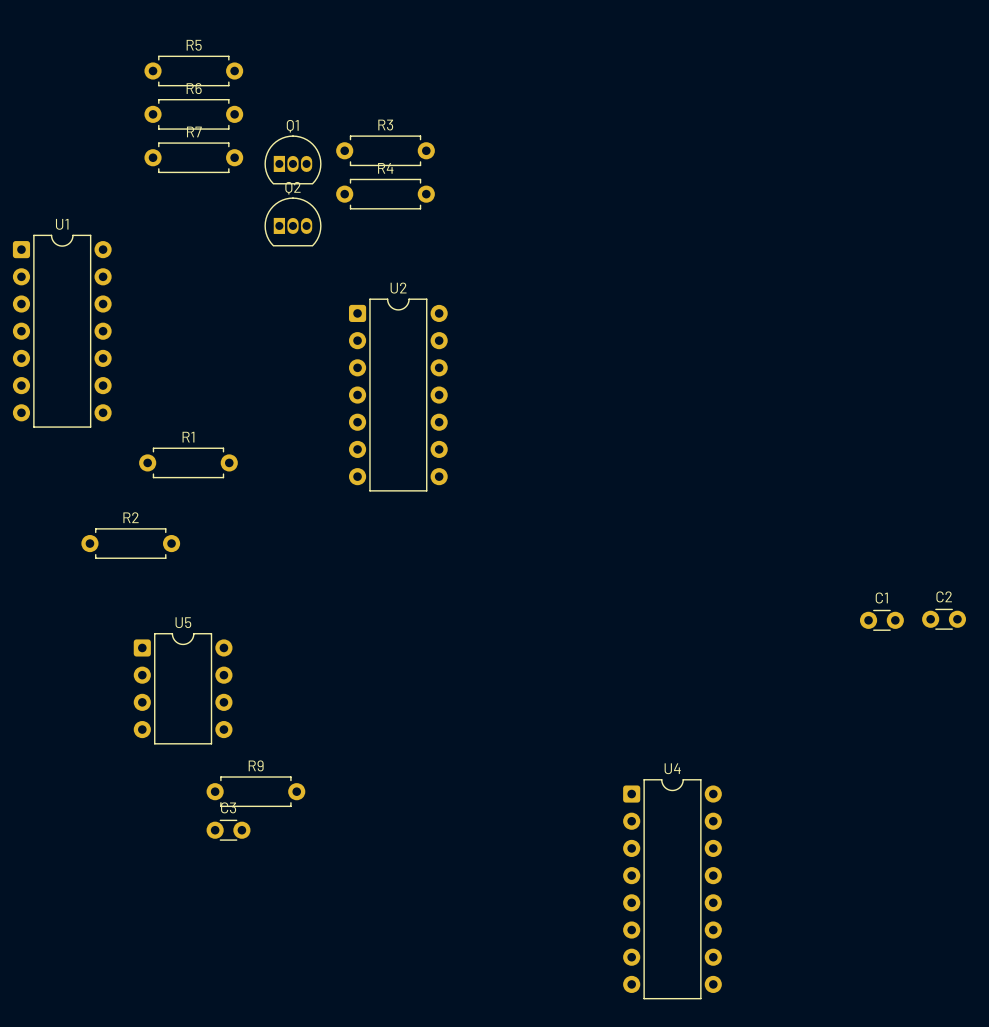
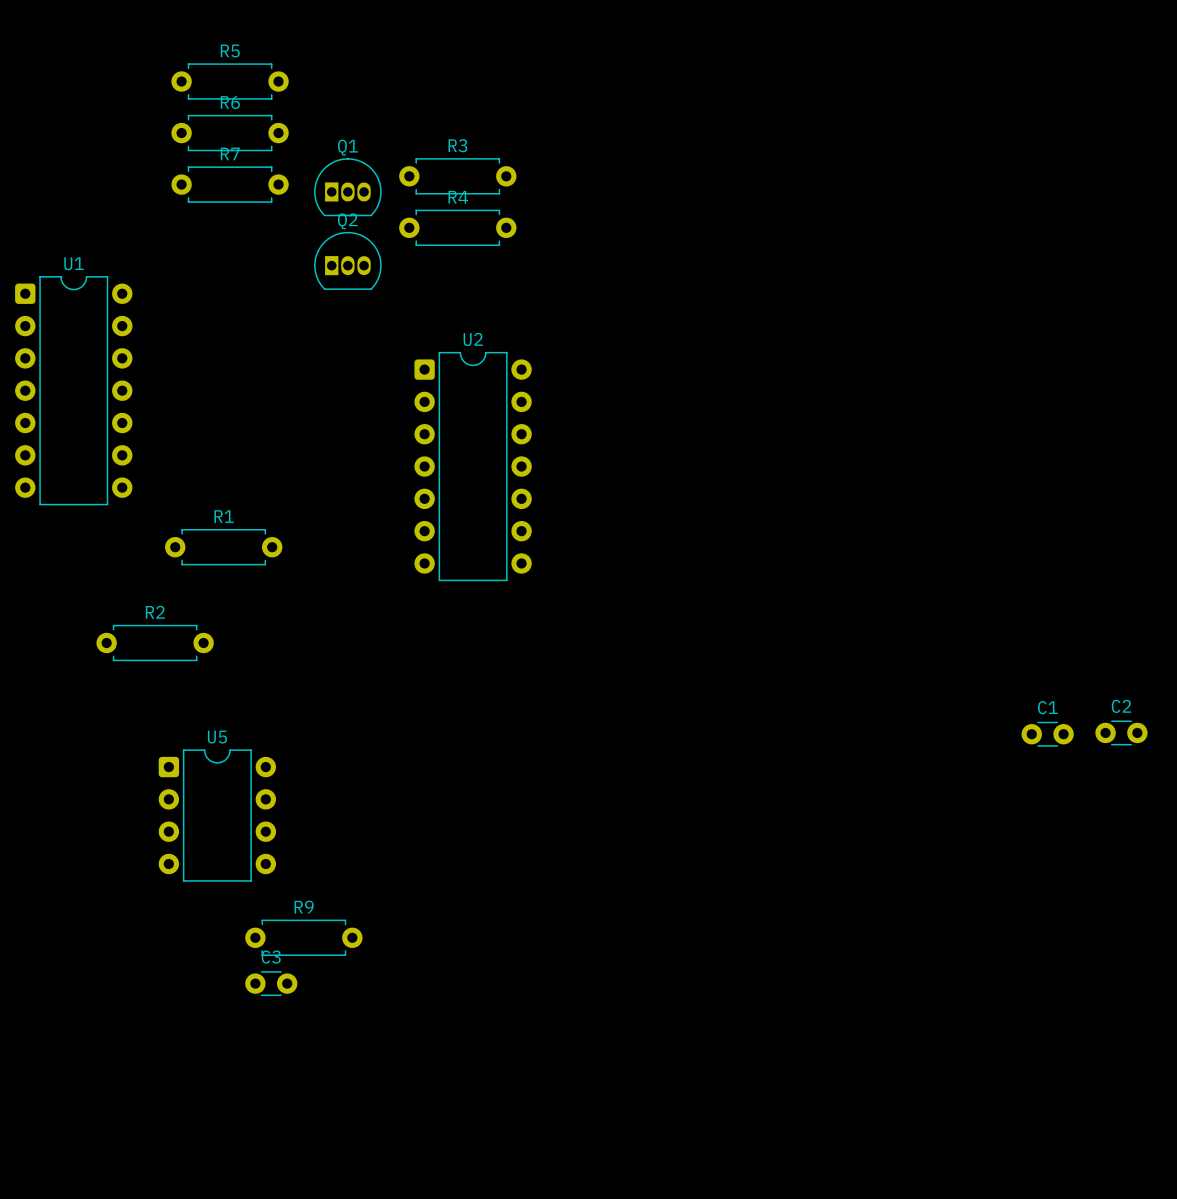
U4: (672, 889) -> none

